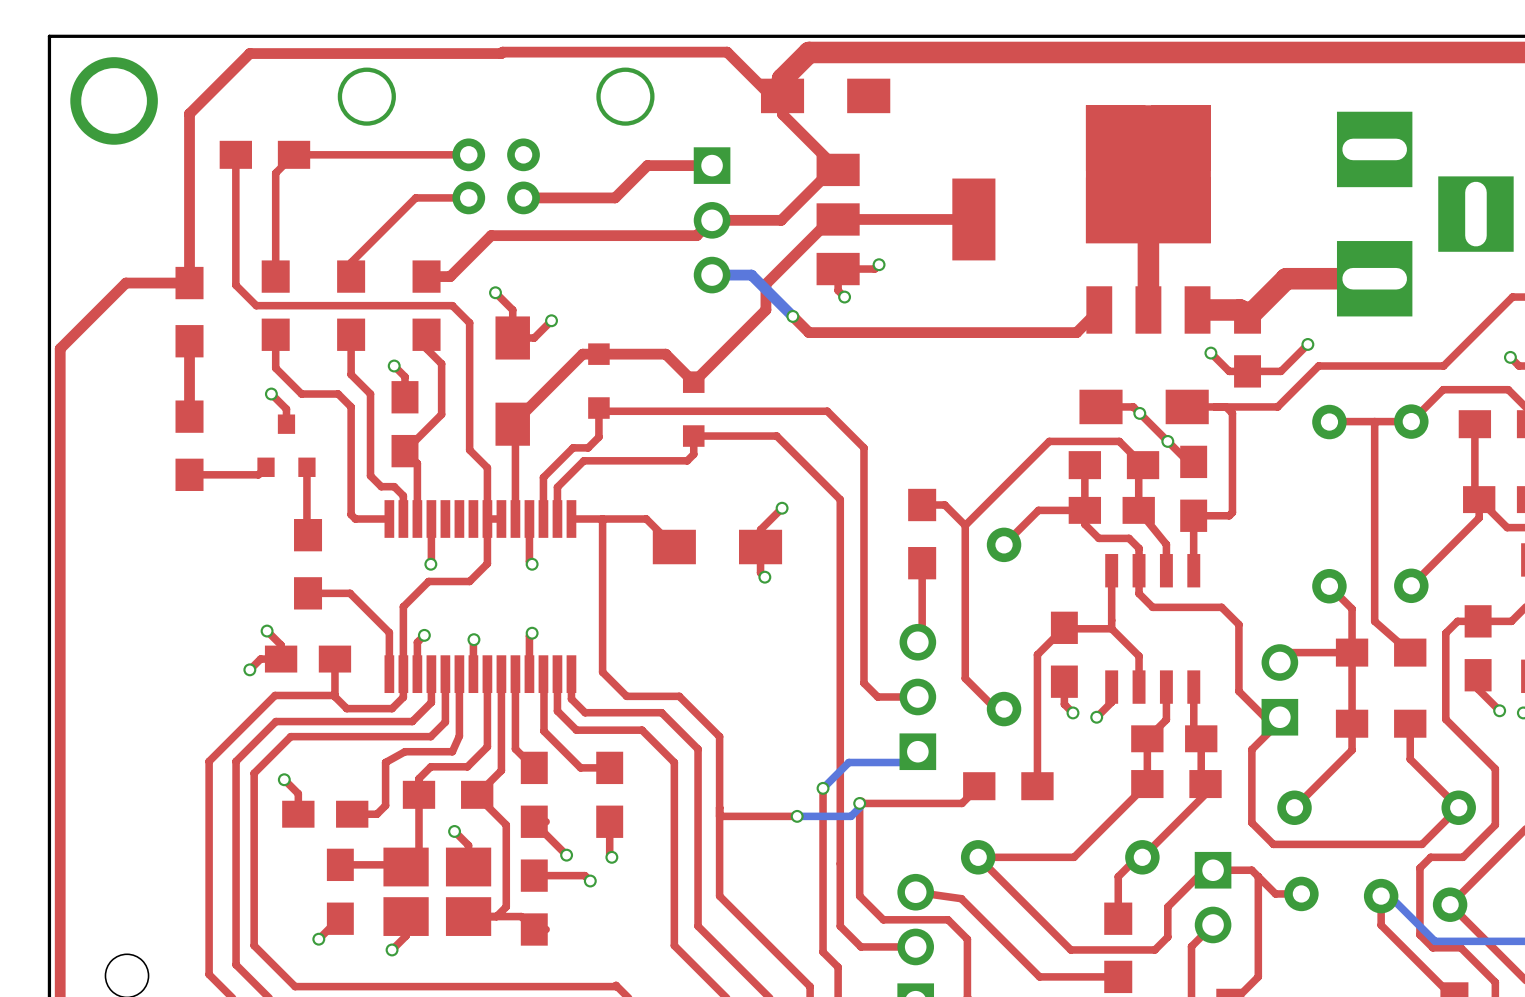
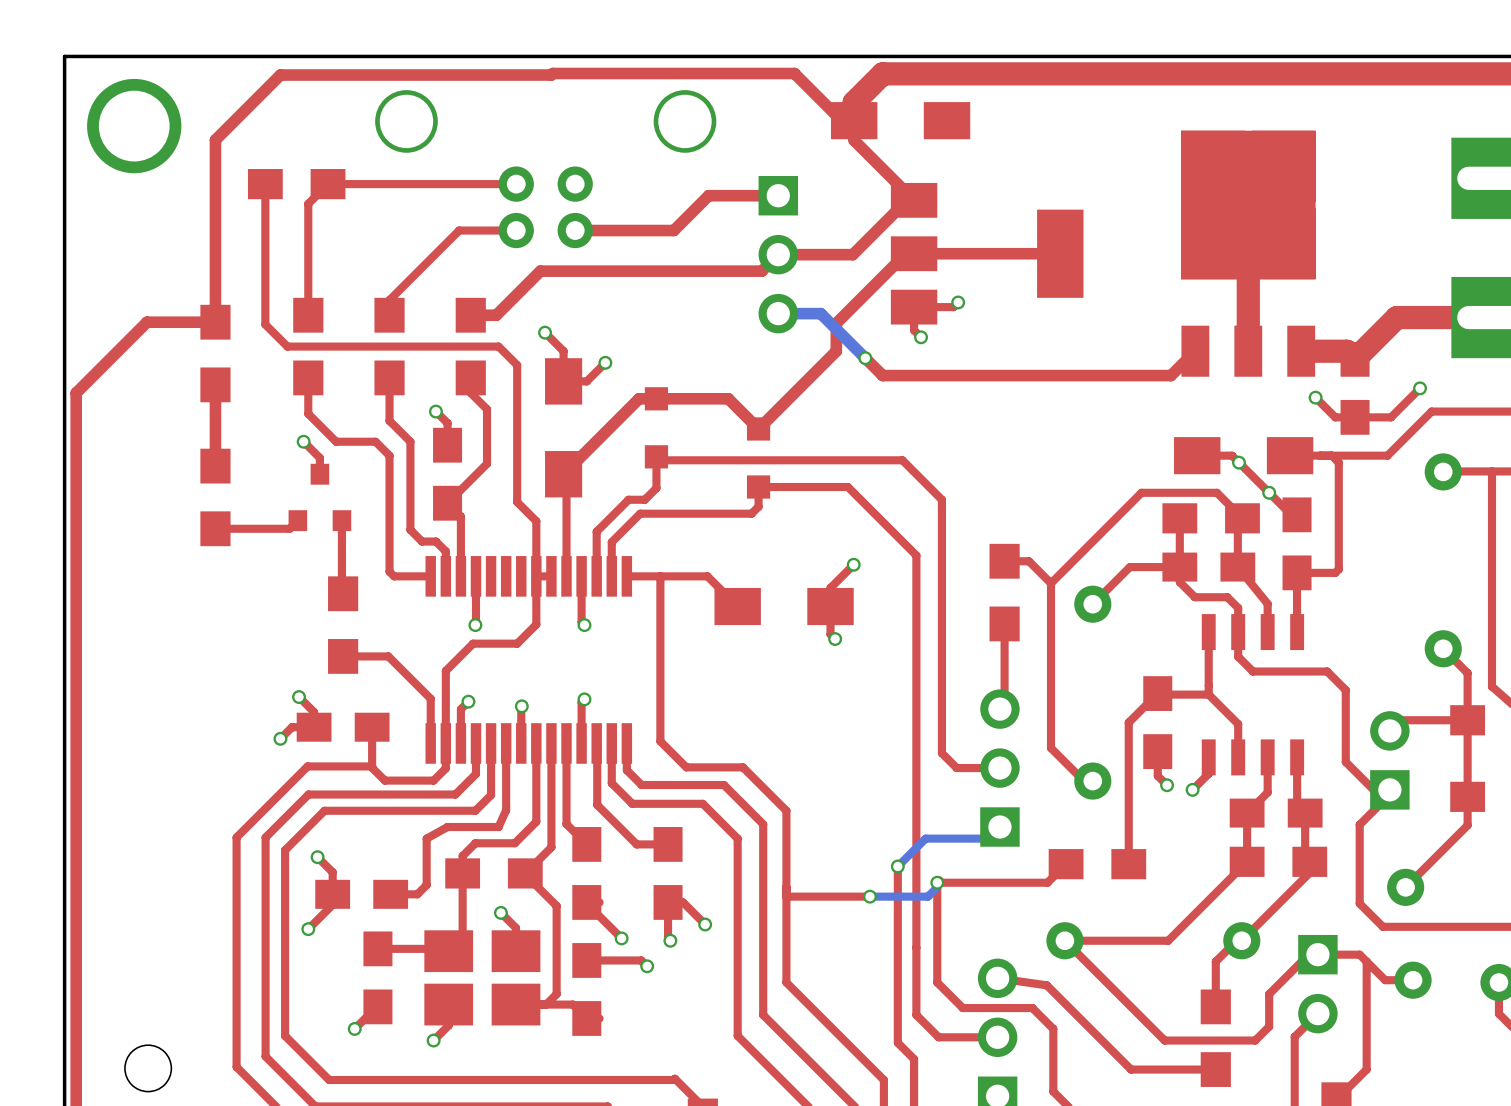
top track: none -> (332, 894) (332, 904) (308, 929)
top track: none -> (668, 902) (683, 902) (705, 924)
via: none -> (705, 924)
via: none -> (308, 929)

